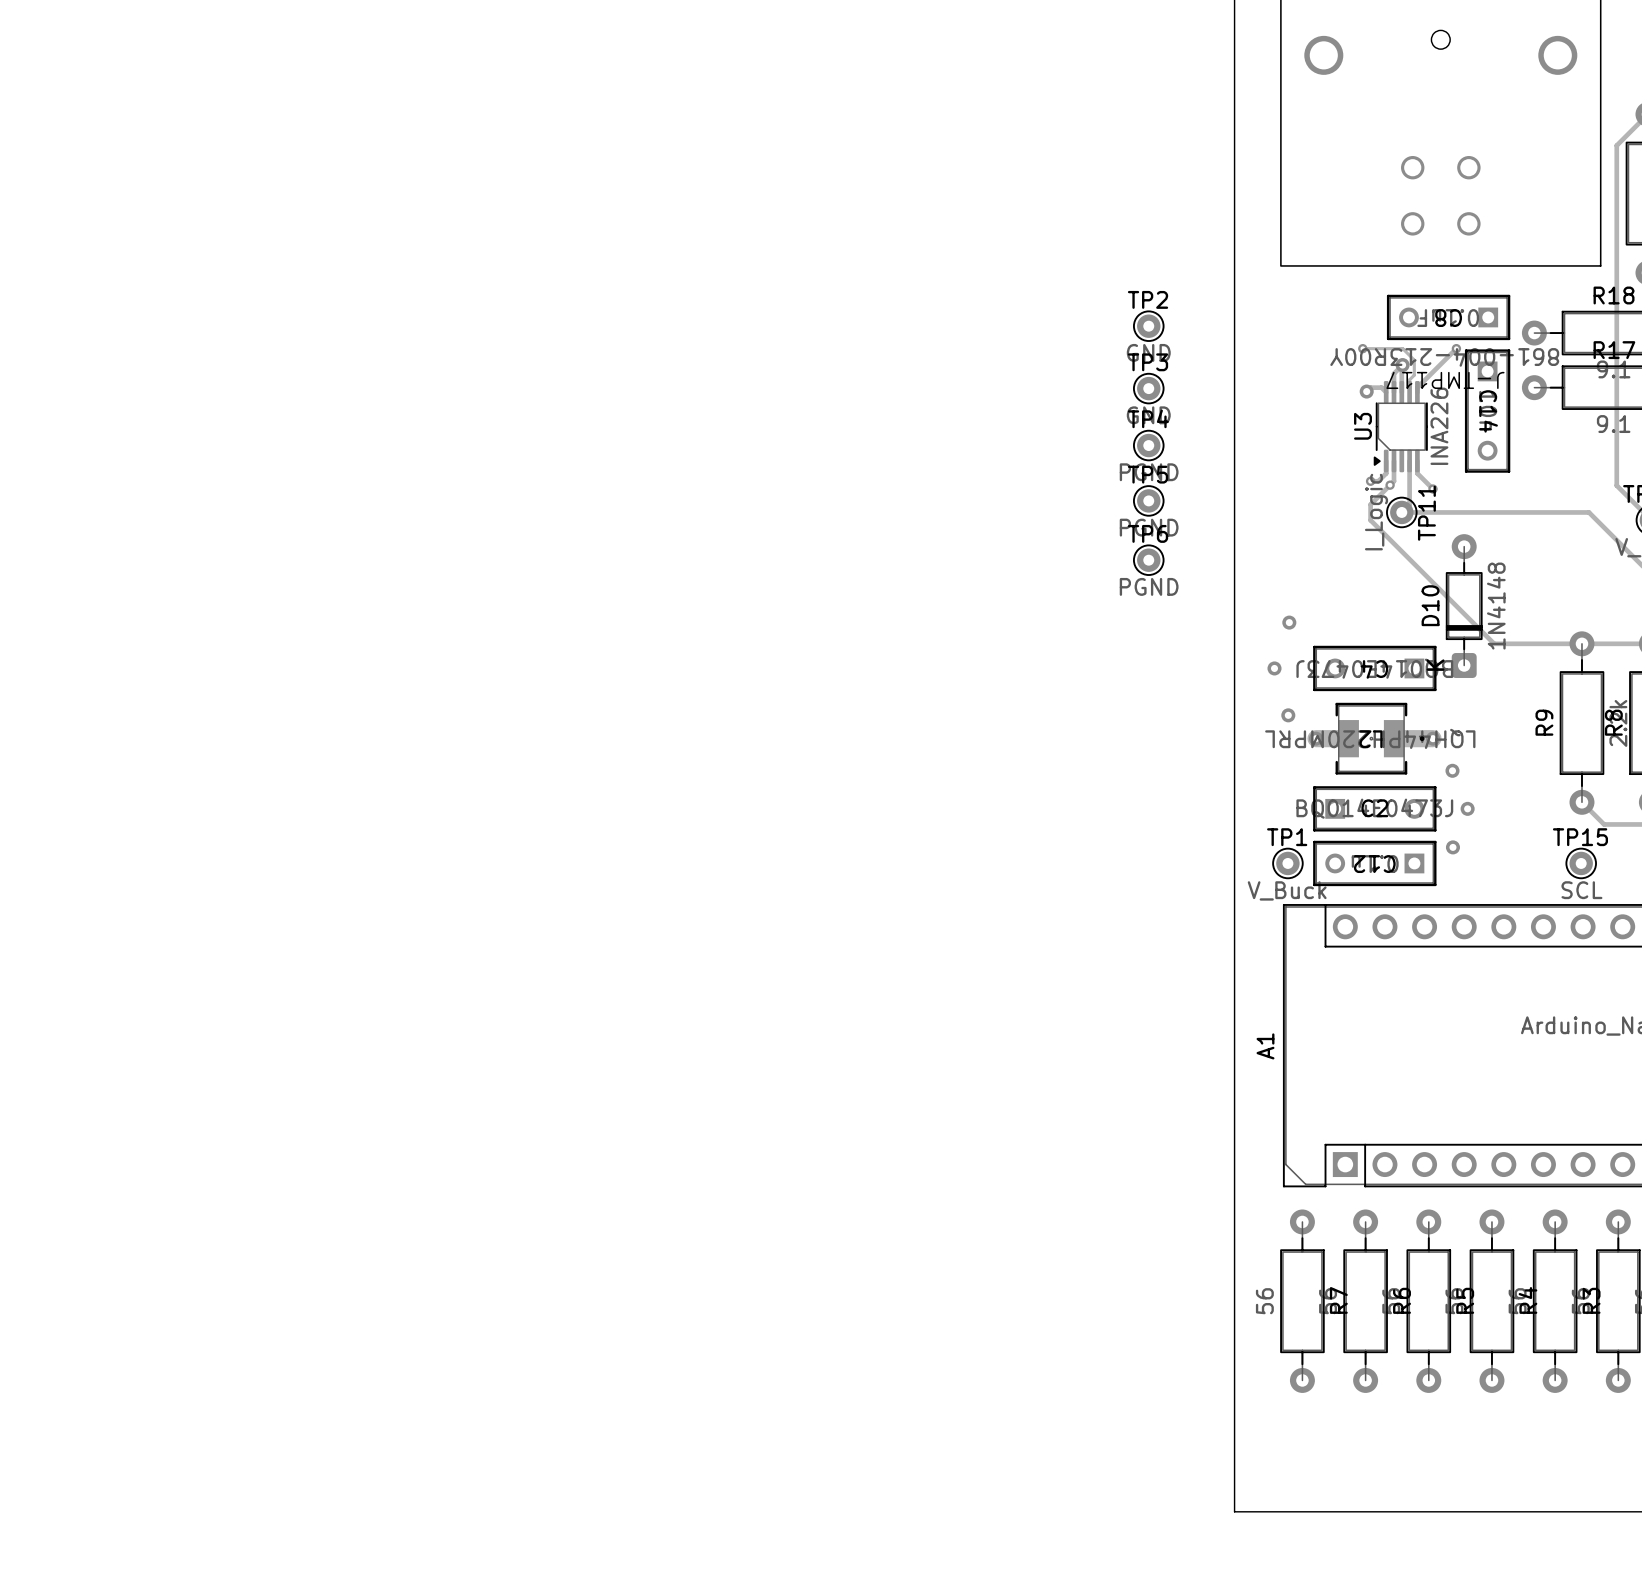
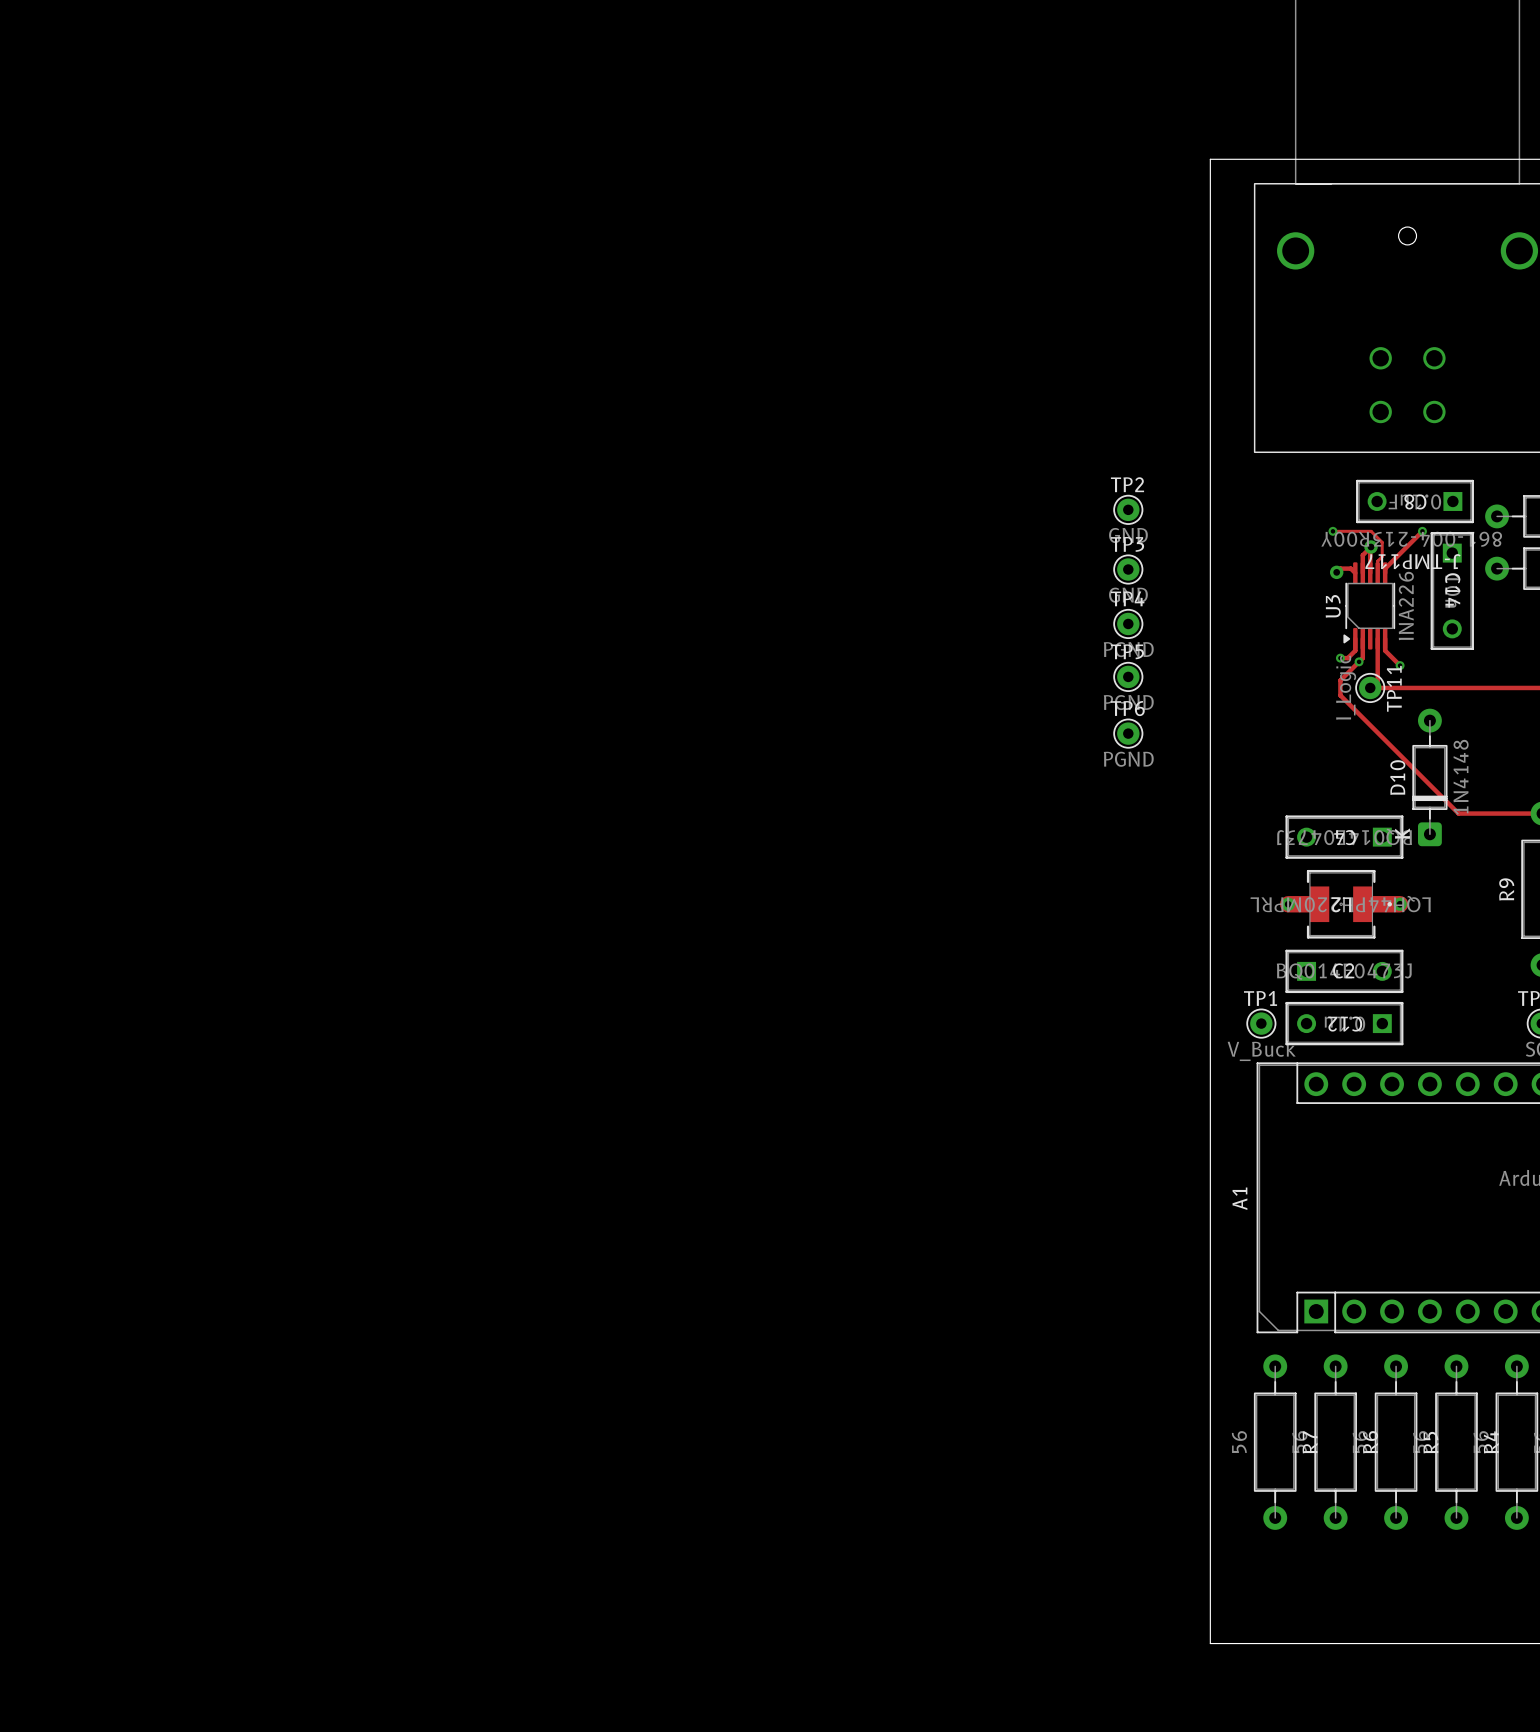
via: (1289, 622) -> none
via: (1274, 668) -> none
via: (1288, 715) -> none
via: (1452, 770) -> none
via: (1467, 808) -> none
via: (1452, 847) -> none

